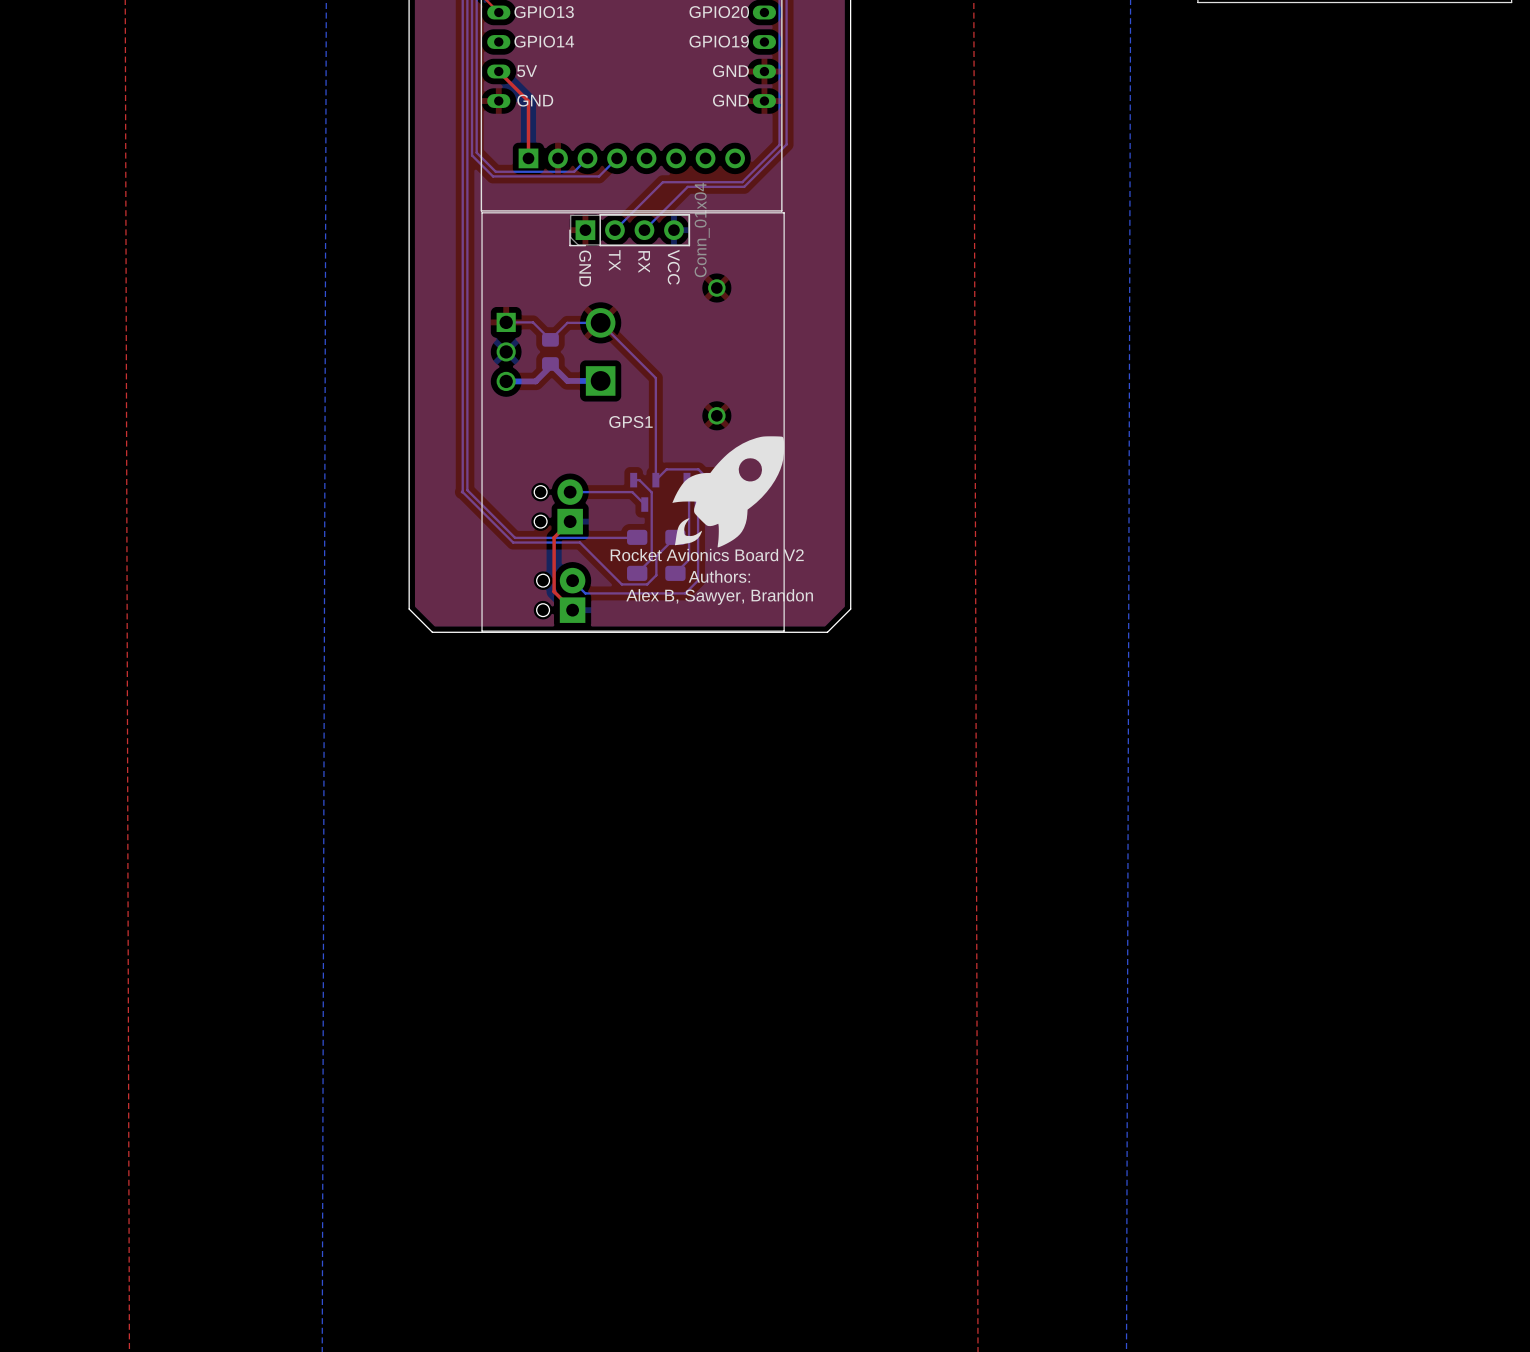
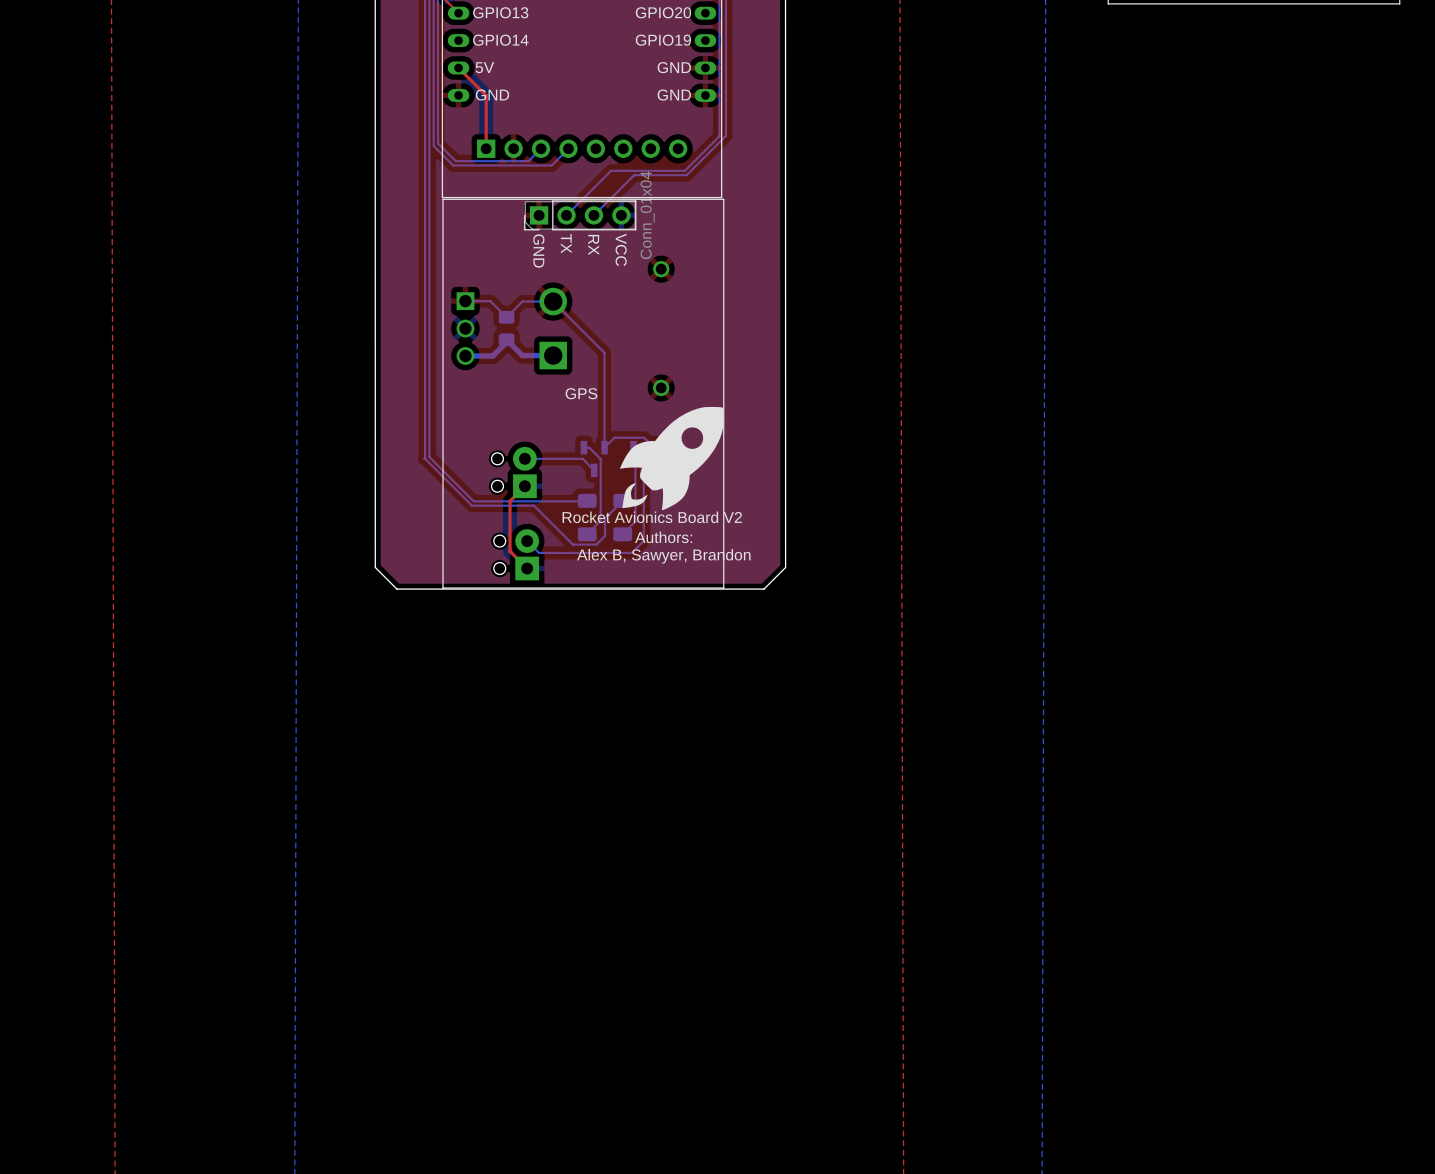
GPS1 name: GPS1 (631, 422) -> GPS (581, 393)

